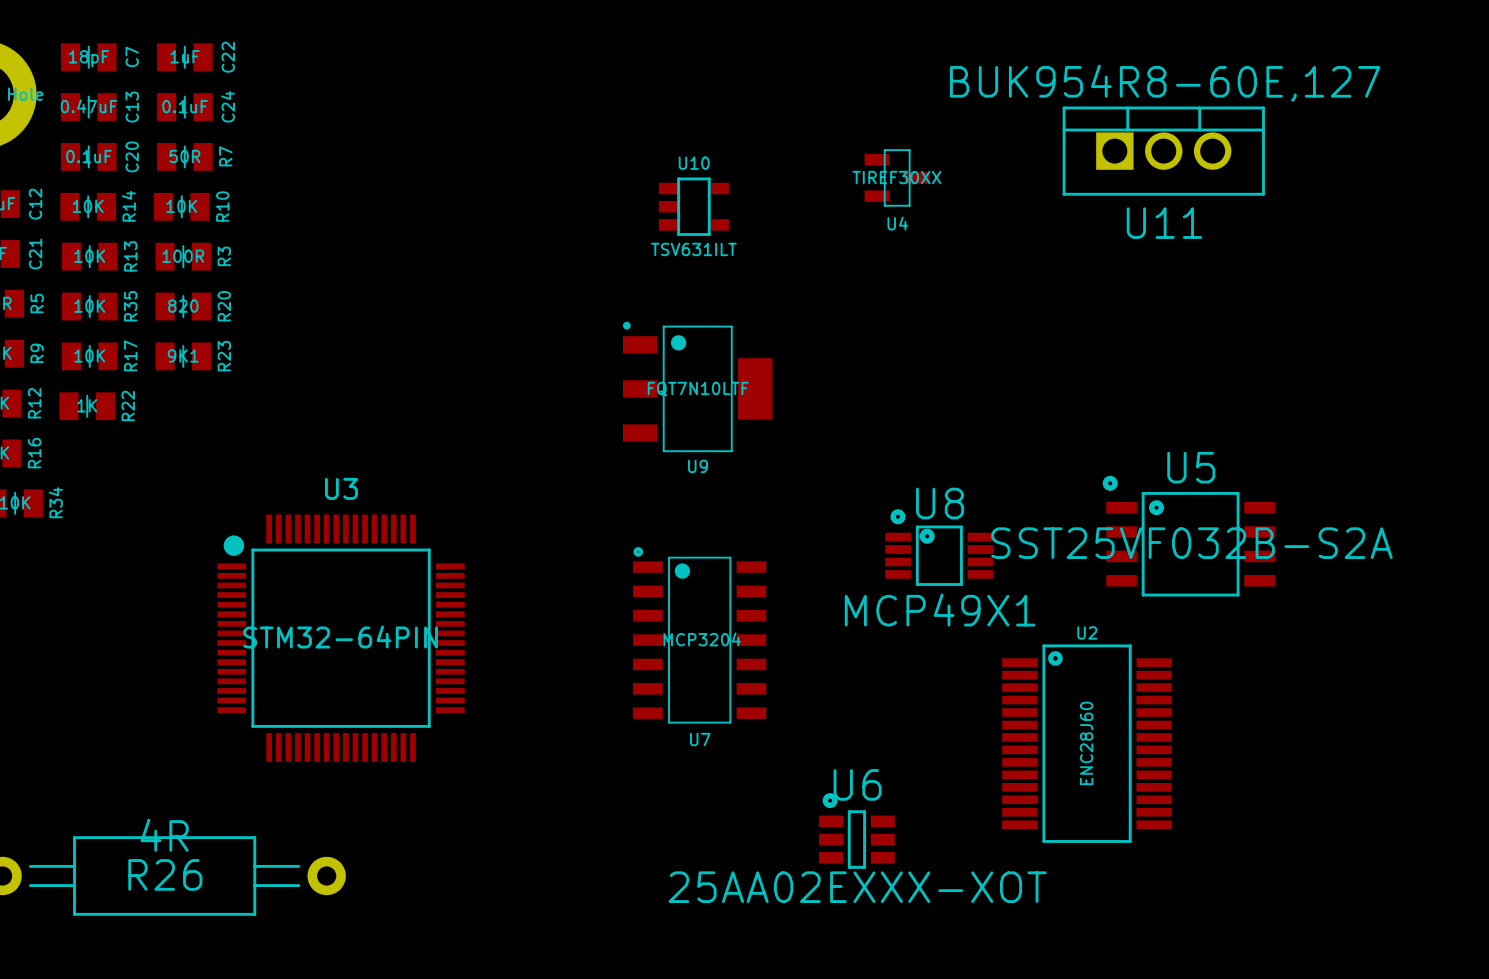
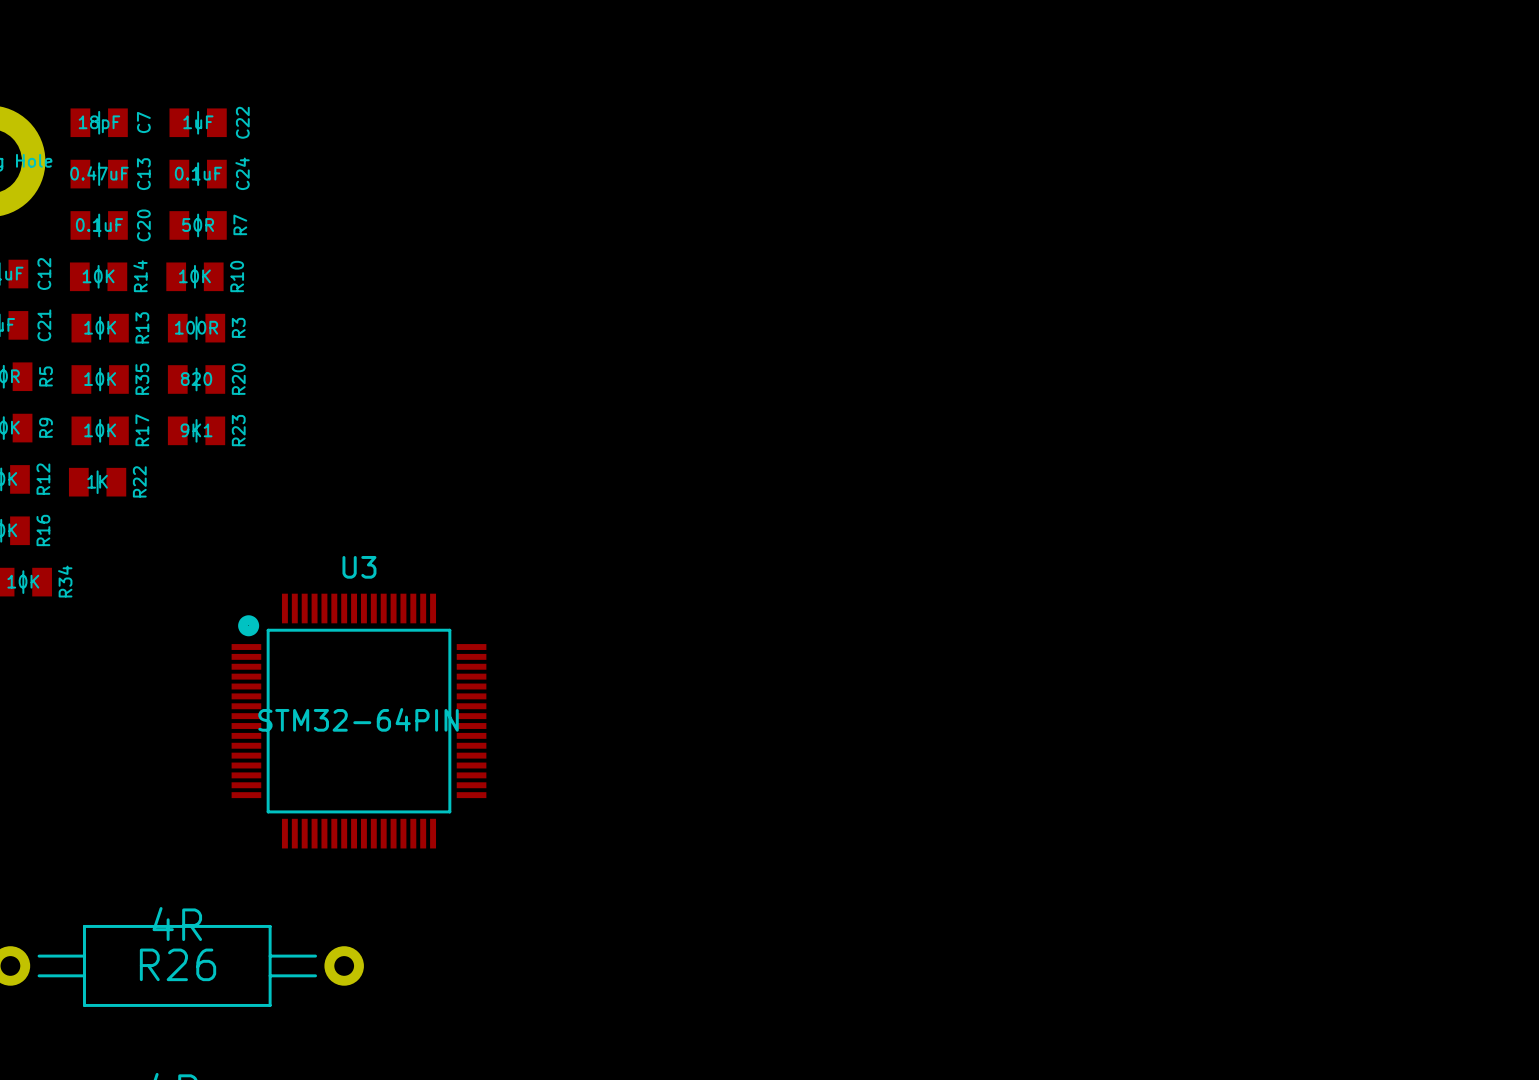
U11: BUK954R8-60E,127 (1163, 151) -> none
U4: TIREF30XX (897, 177) -> none
U10: TSV631ILT (693, 206) -> none
U9: FQT7N10LTF (697, 386) -> none
U5: SST25VF032B-S2A (1188, 536) -> none
U8: MCP49X1 (939, 547) -> none
U7: MCP3204 (699, 635) -> none
U2: ENC28J60 (1087, 743) -> none
U6: 25AA02EXXX-XOT (856, 830) -> none

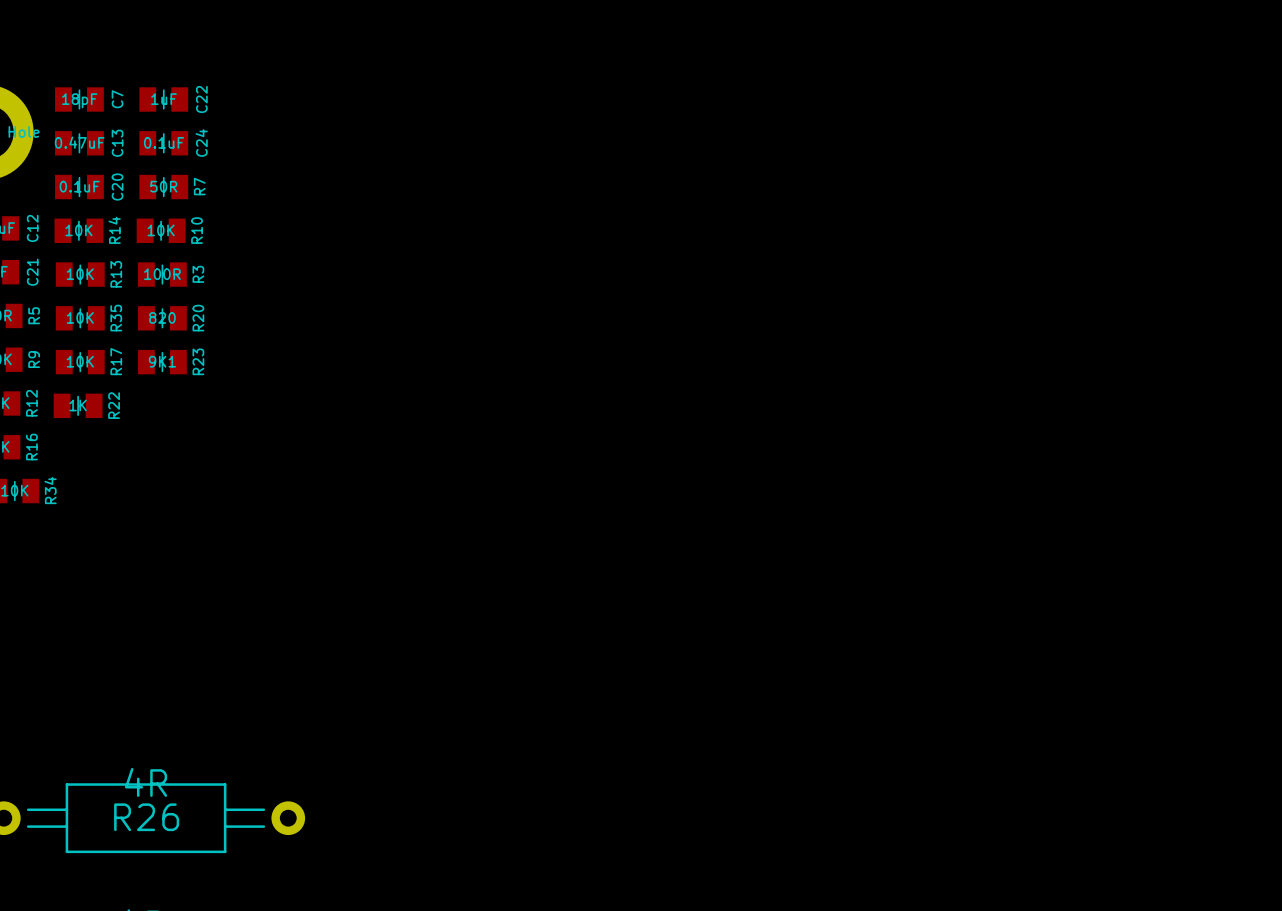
U3: STM32-64PIN (358, 721) -> none

